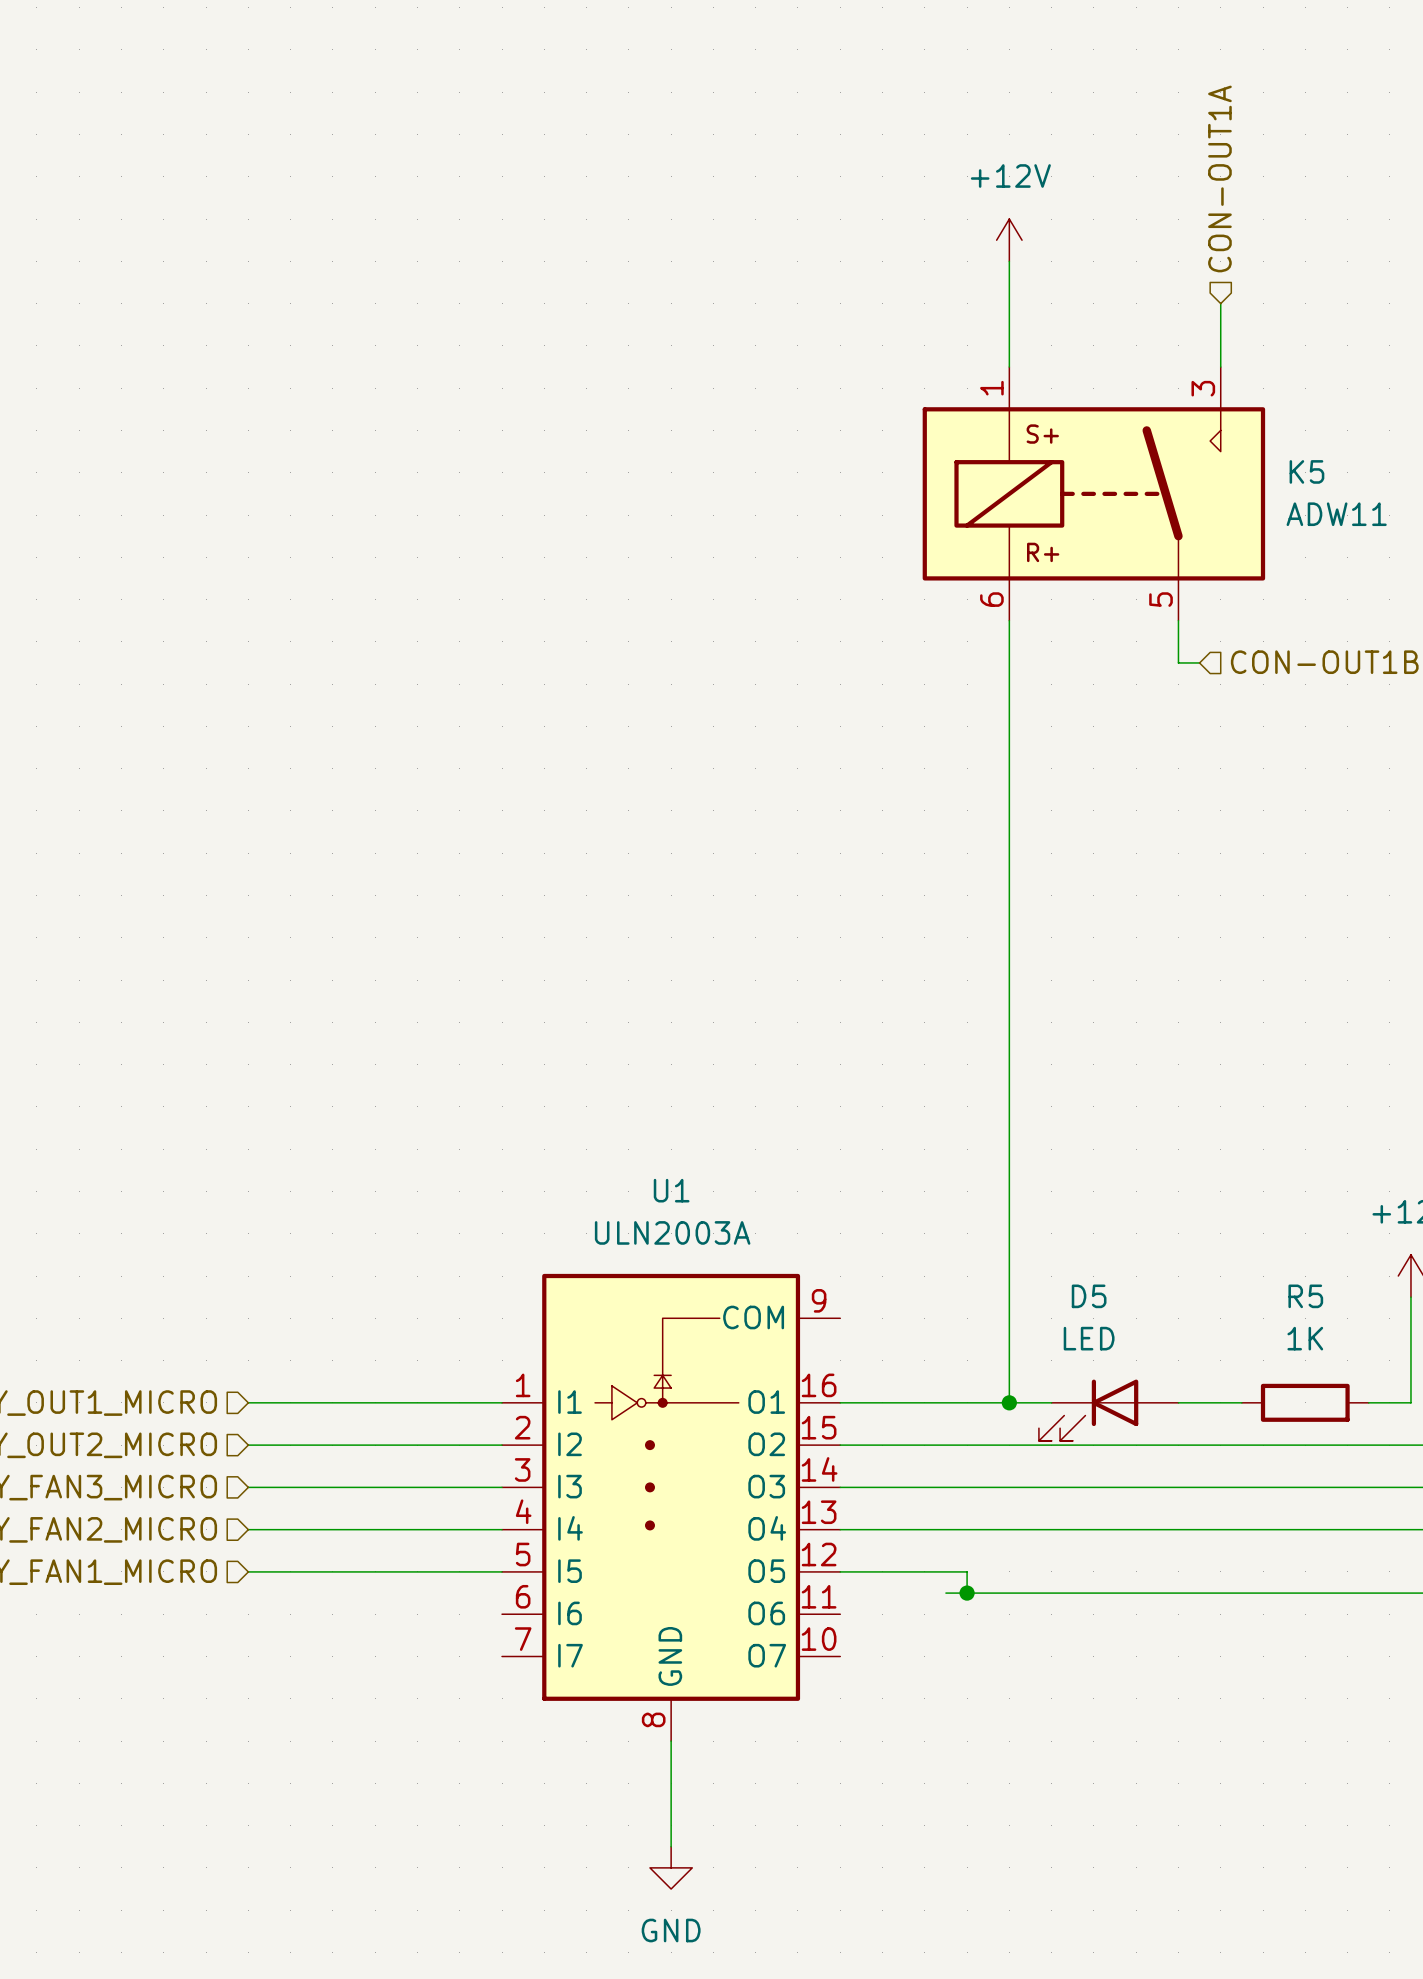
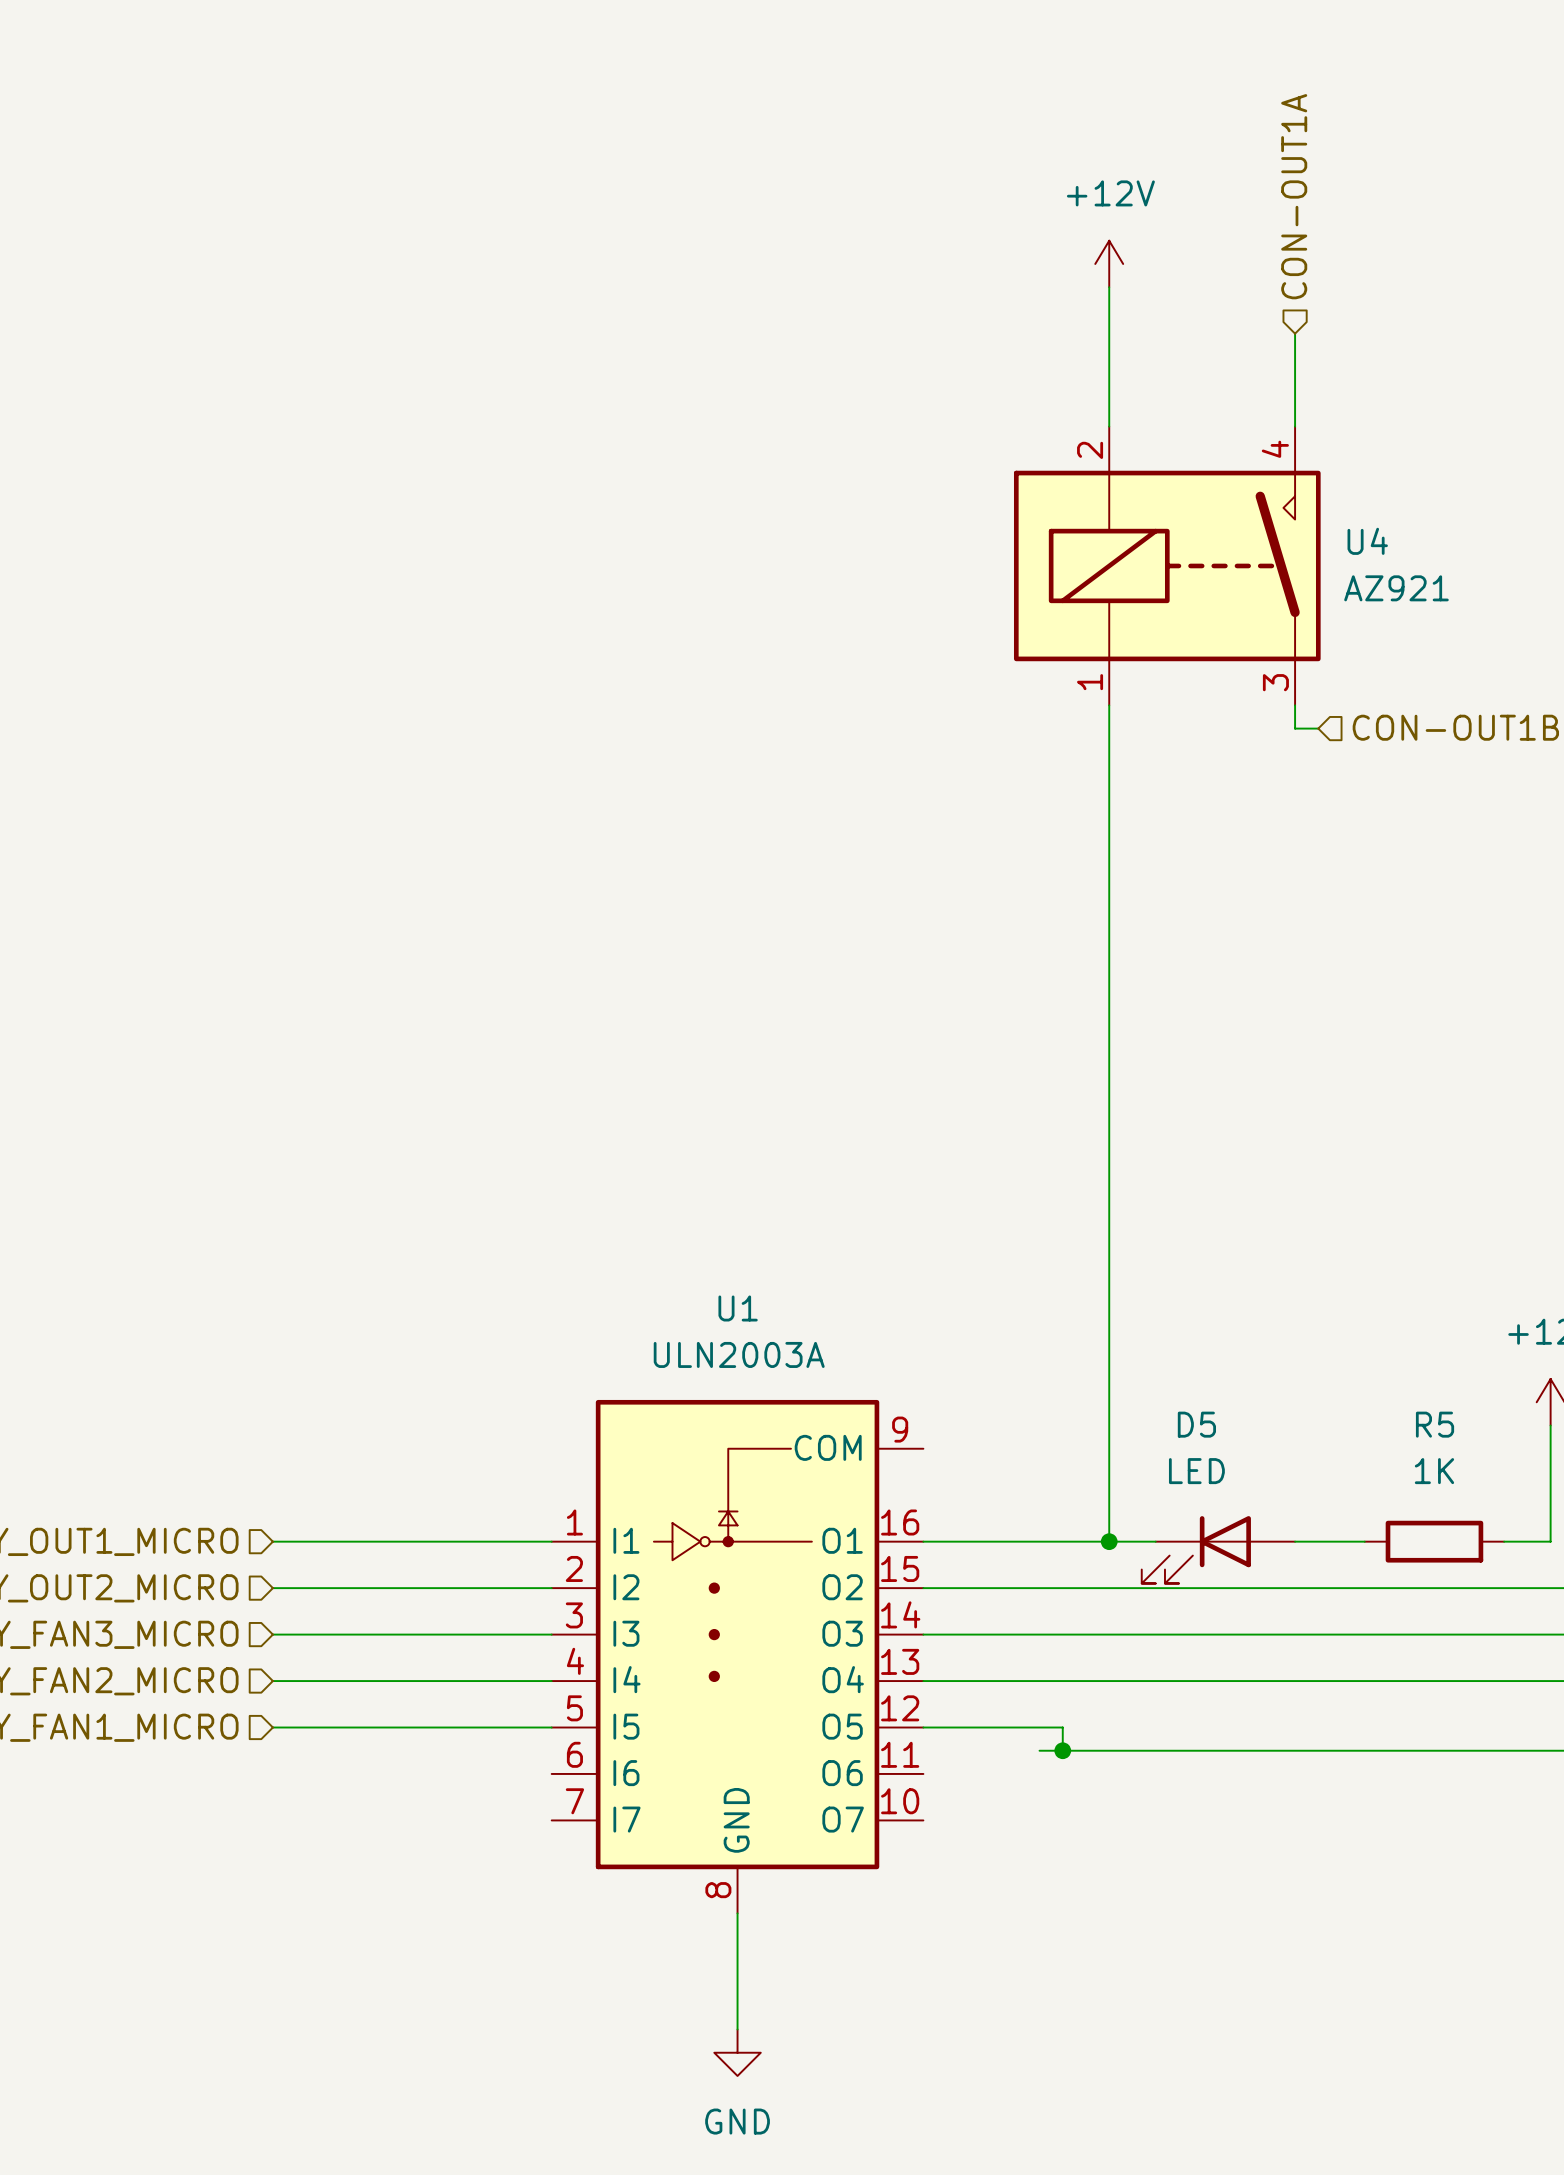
hierarchical label position: CON-OUT1A (1219, 178) -> CON-OUT1A (1294, 196)
wire: none -> (1295, 333) (1295, 426)
wire: (1220, 303) (1220, 367) -> none
K5: ADW11 (1093, 493) -> none
U4: none -> AZ921 (1167, 565)

